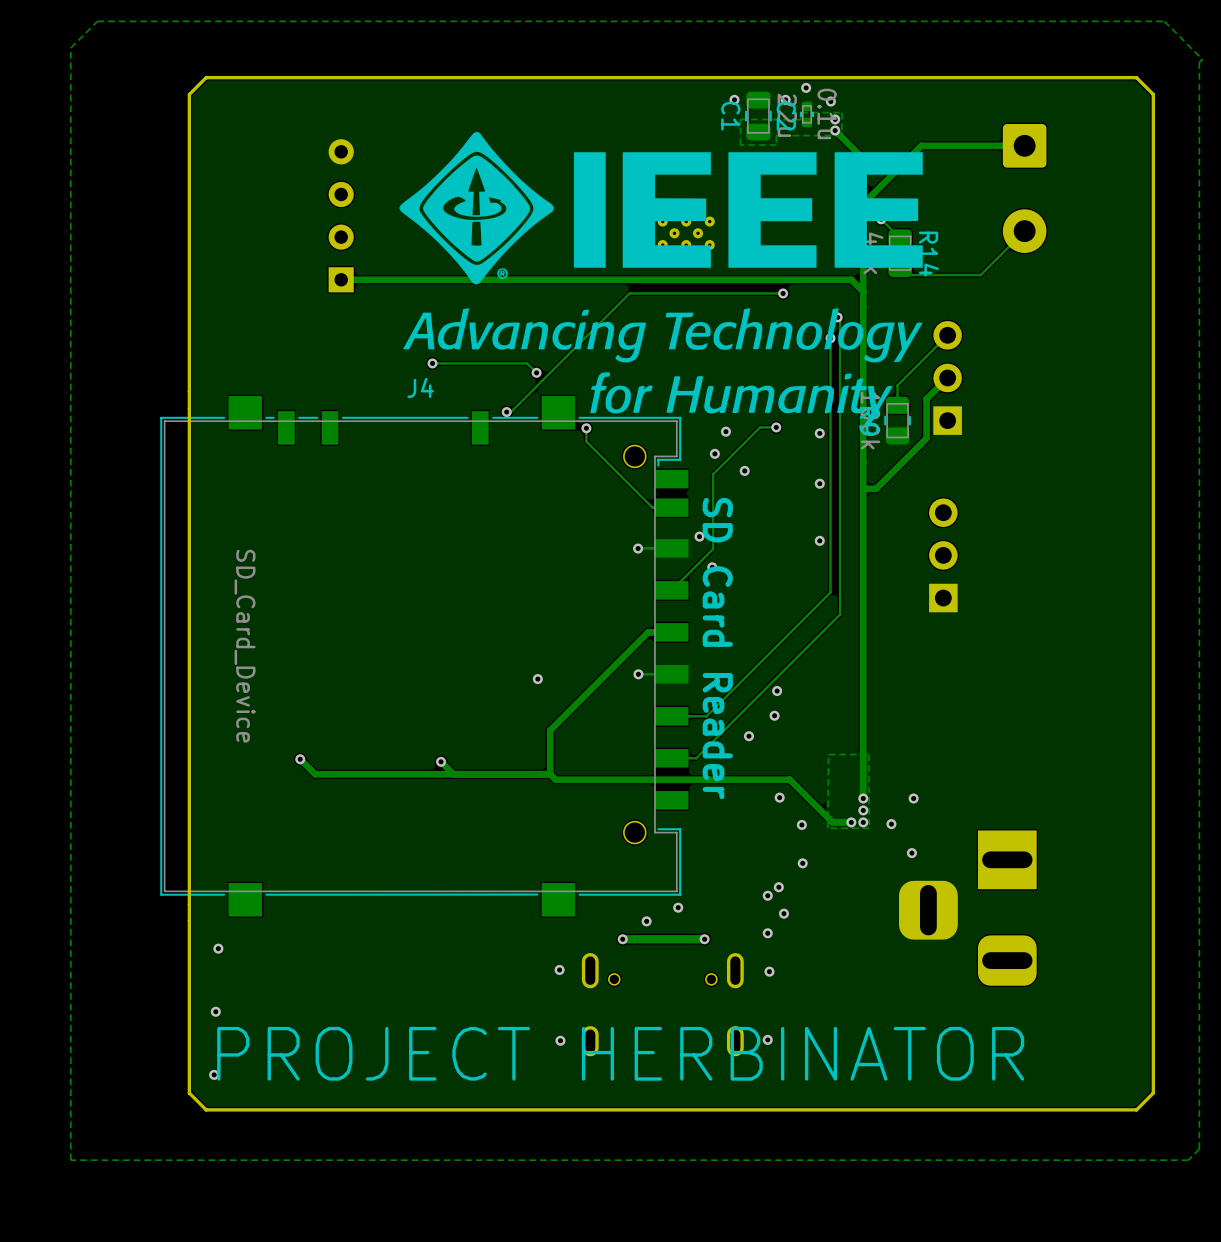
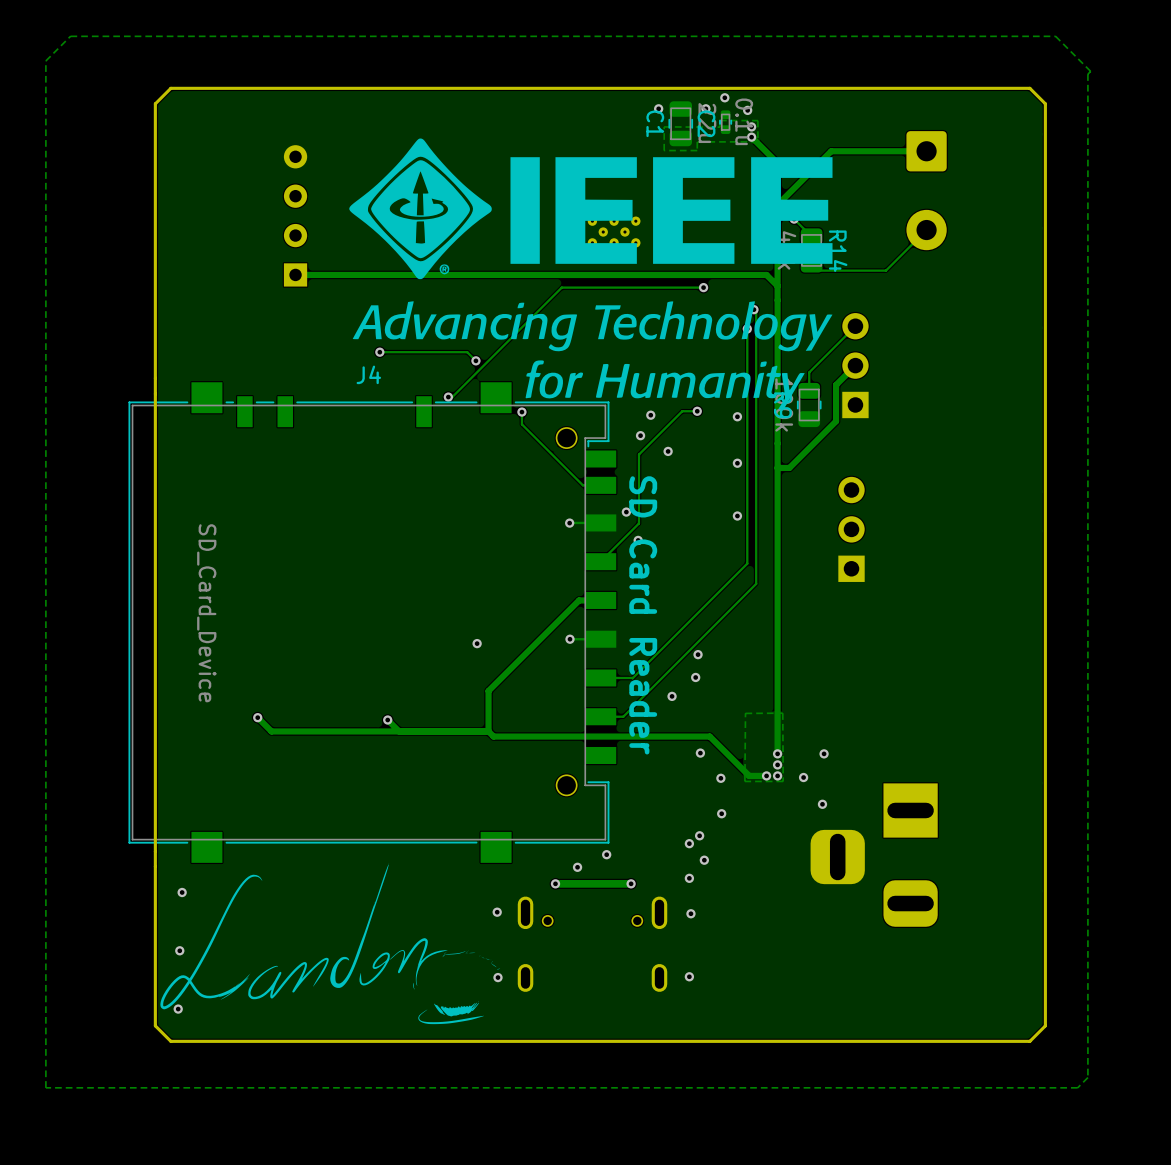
drawing: none -> [160, 862, 501, 1025]
text: PROJECT HERBINATOR (620, 1053) -> none

